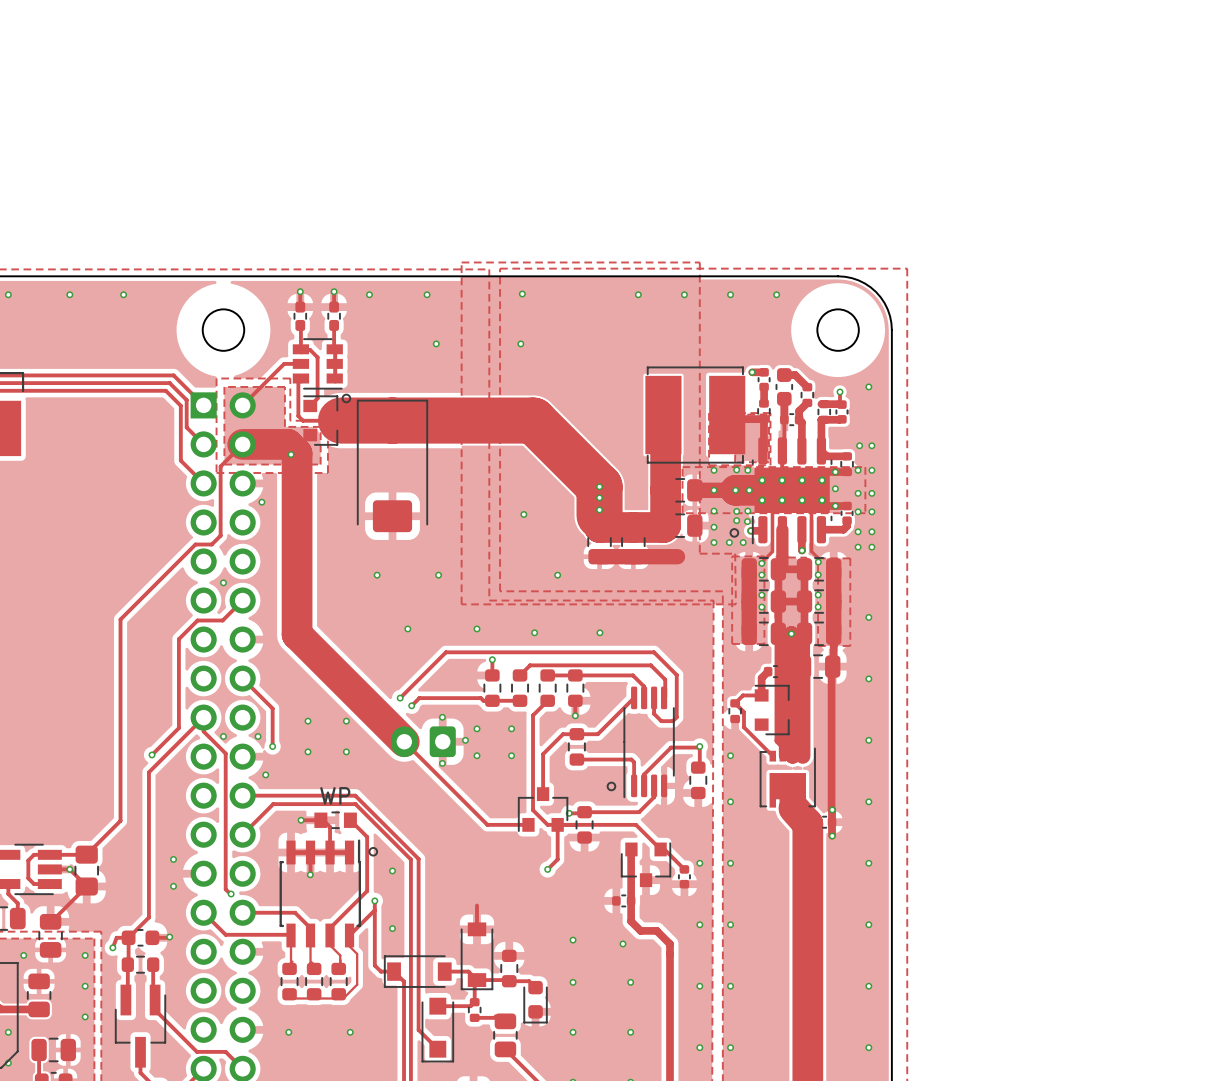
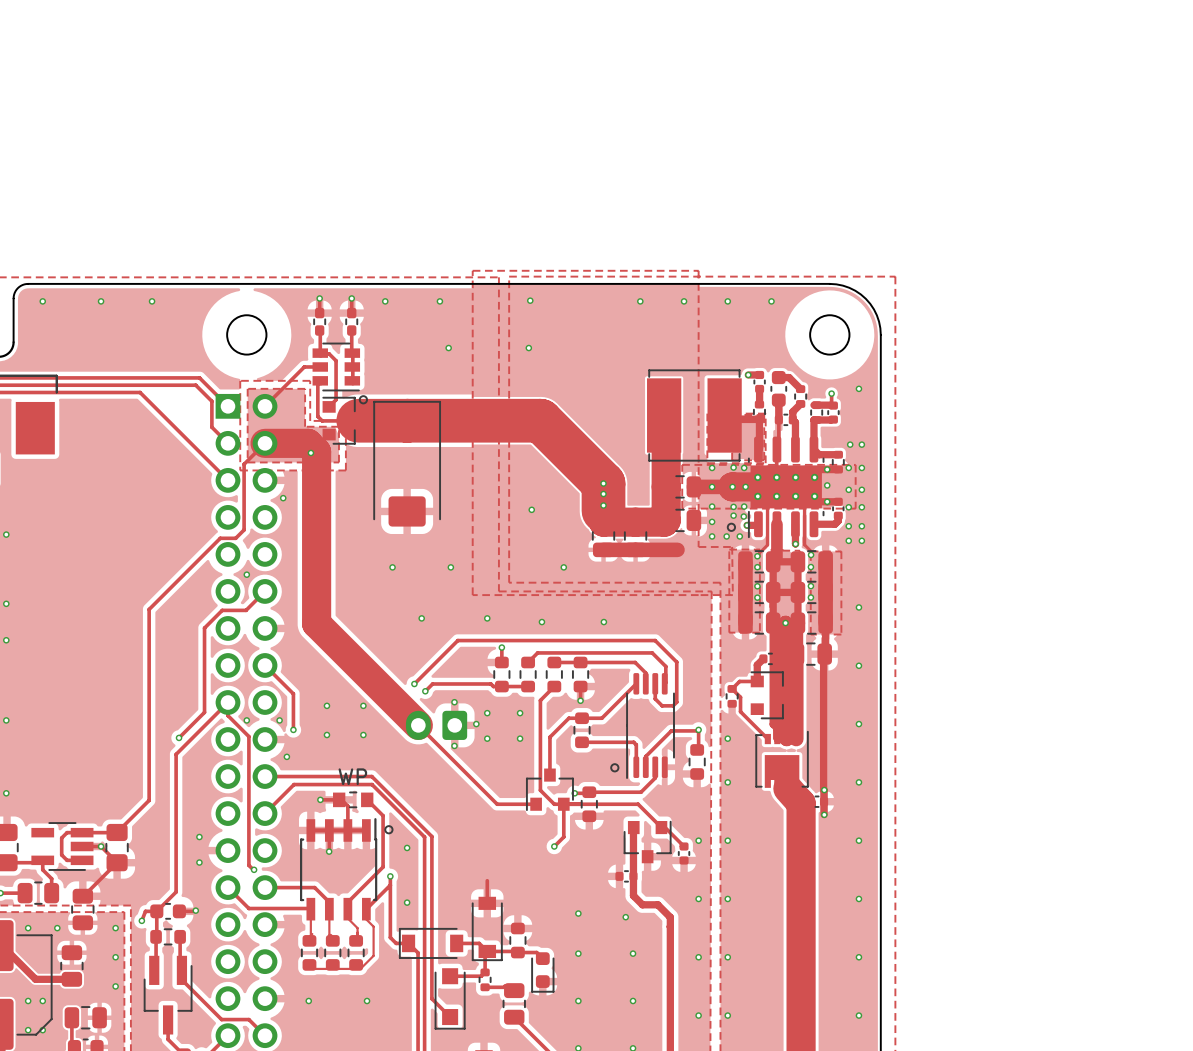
track: (111, 390) (165, 390) (180, 405) (180, 460) -> (140, 392) (206, 458)

